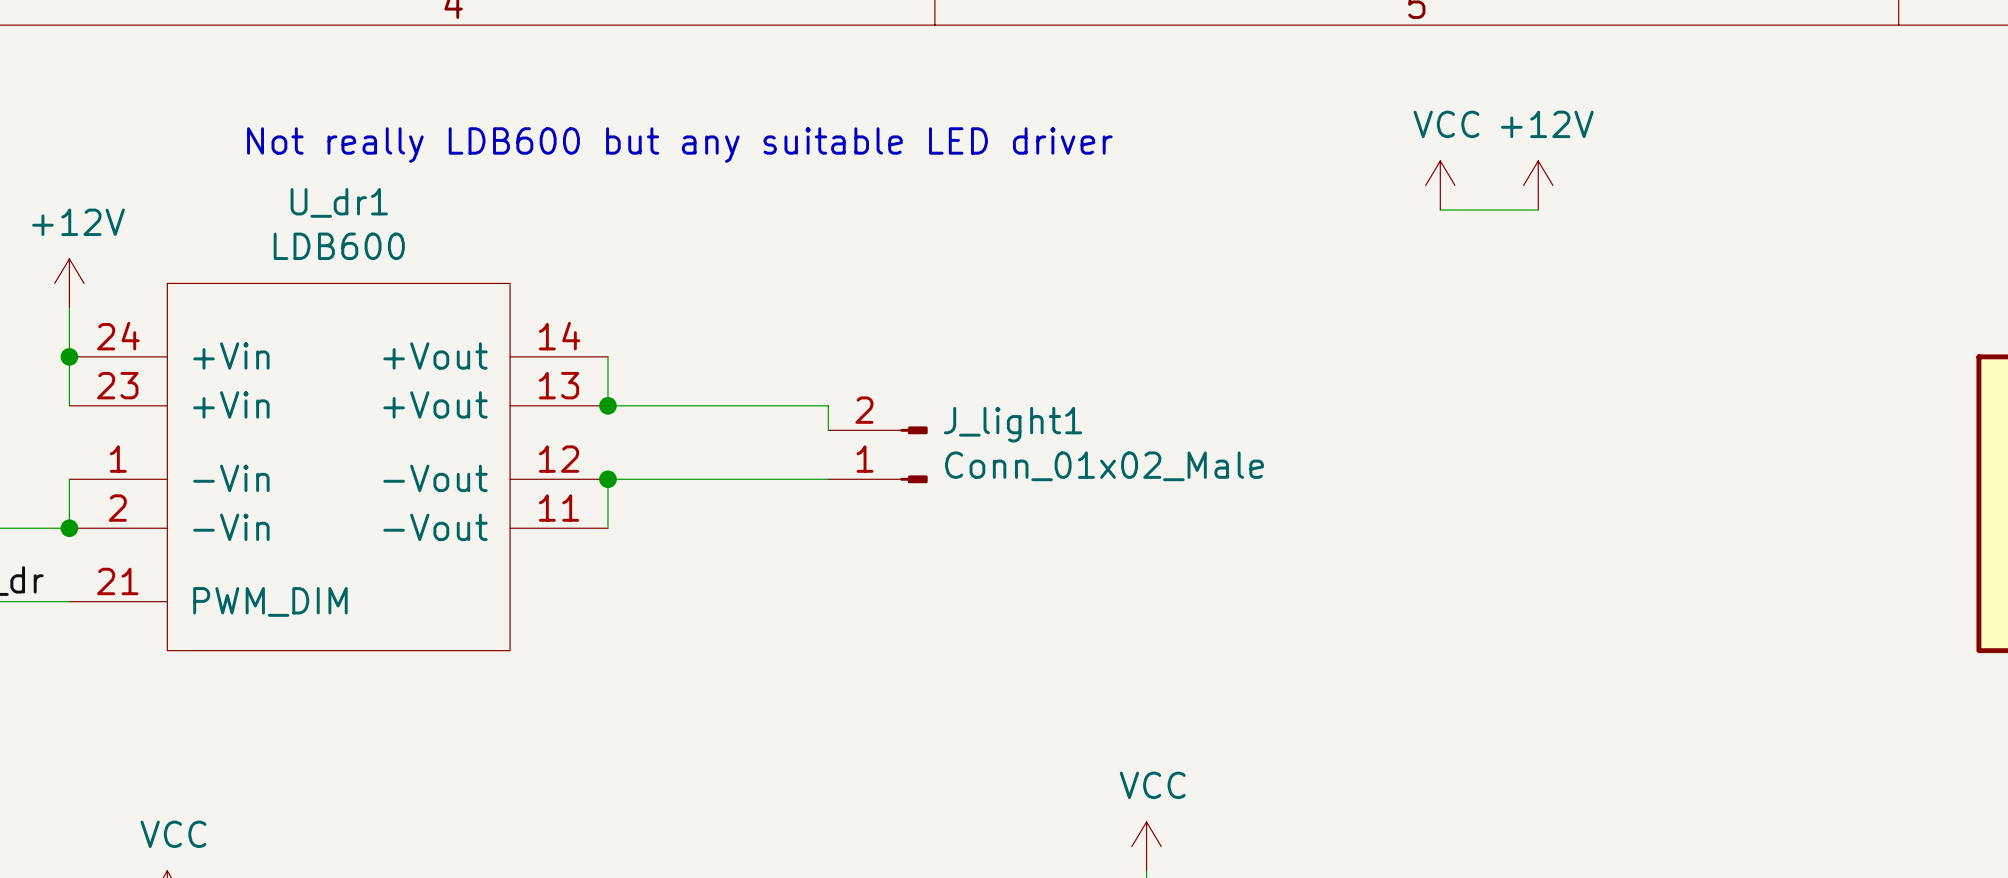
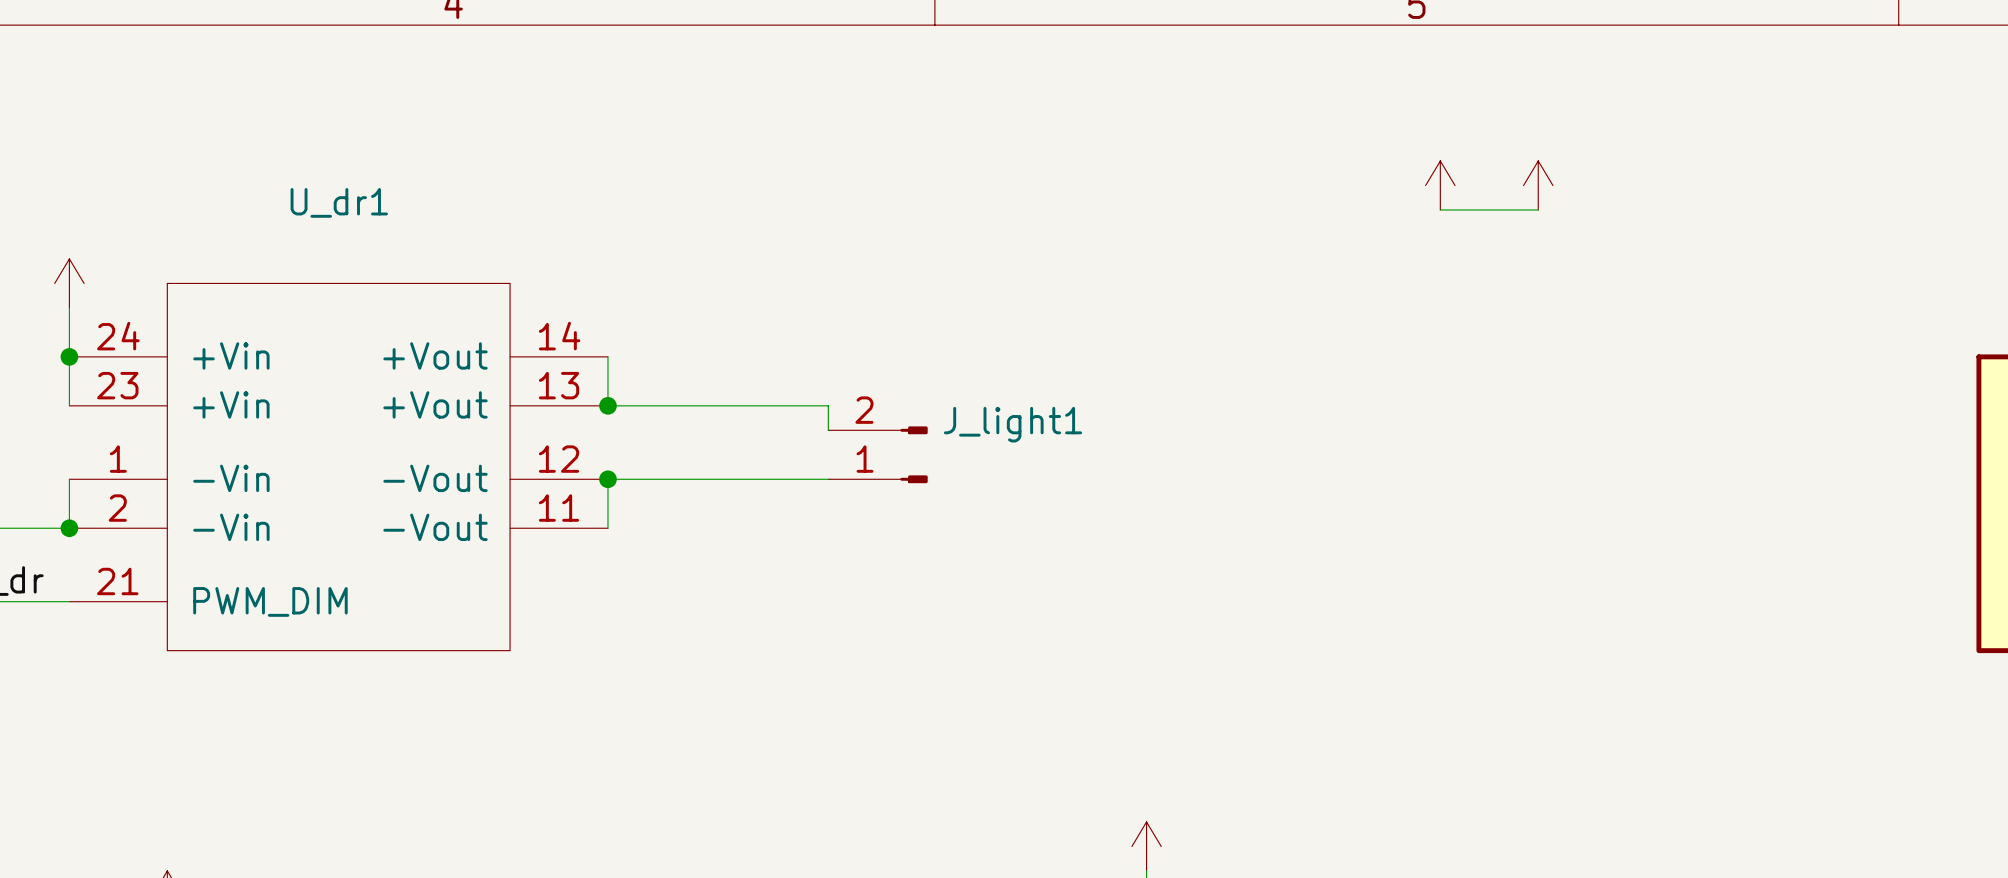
power symbol text: VCC (1446, 124) -> none
power symbol text: +12V (1547, 124) -> none
text: Not really LDB600 but any suitable LED driver (679, 145) -> none
power symbol text: +12V (78, 222) -> none
U_dr1 value: LDB600 (339, 246) -> none
J_light1 value: Conn_01x02_Male (1104, 466) -> none
power symbol text: VCC (1152, 785) -> none
power symbol text: VCC (173, 834) -> none

